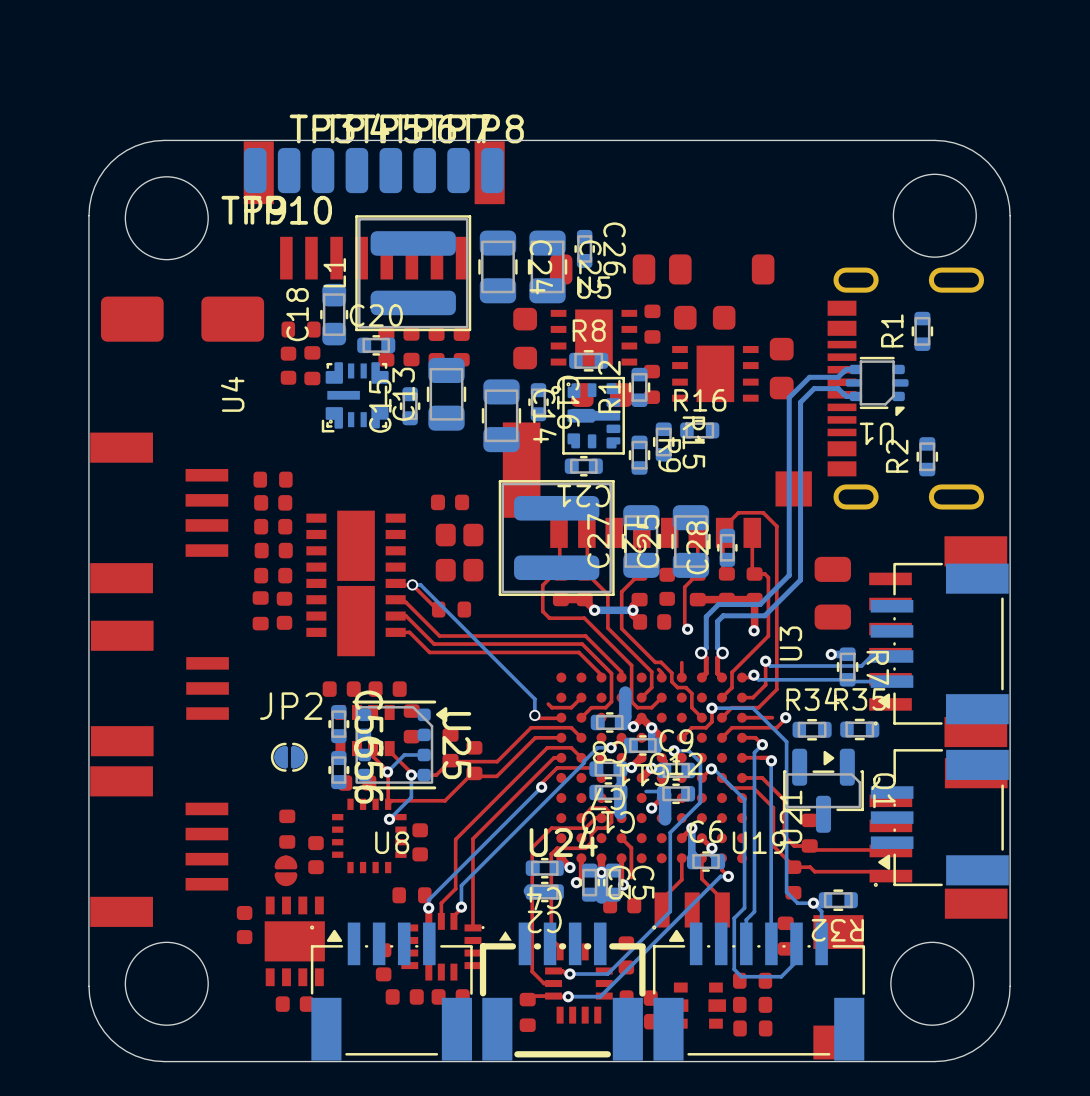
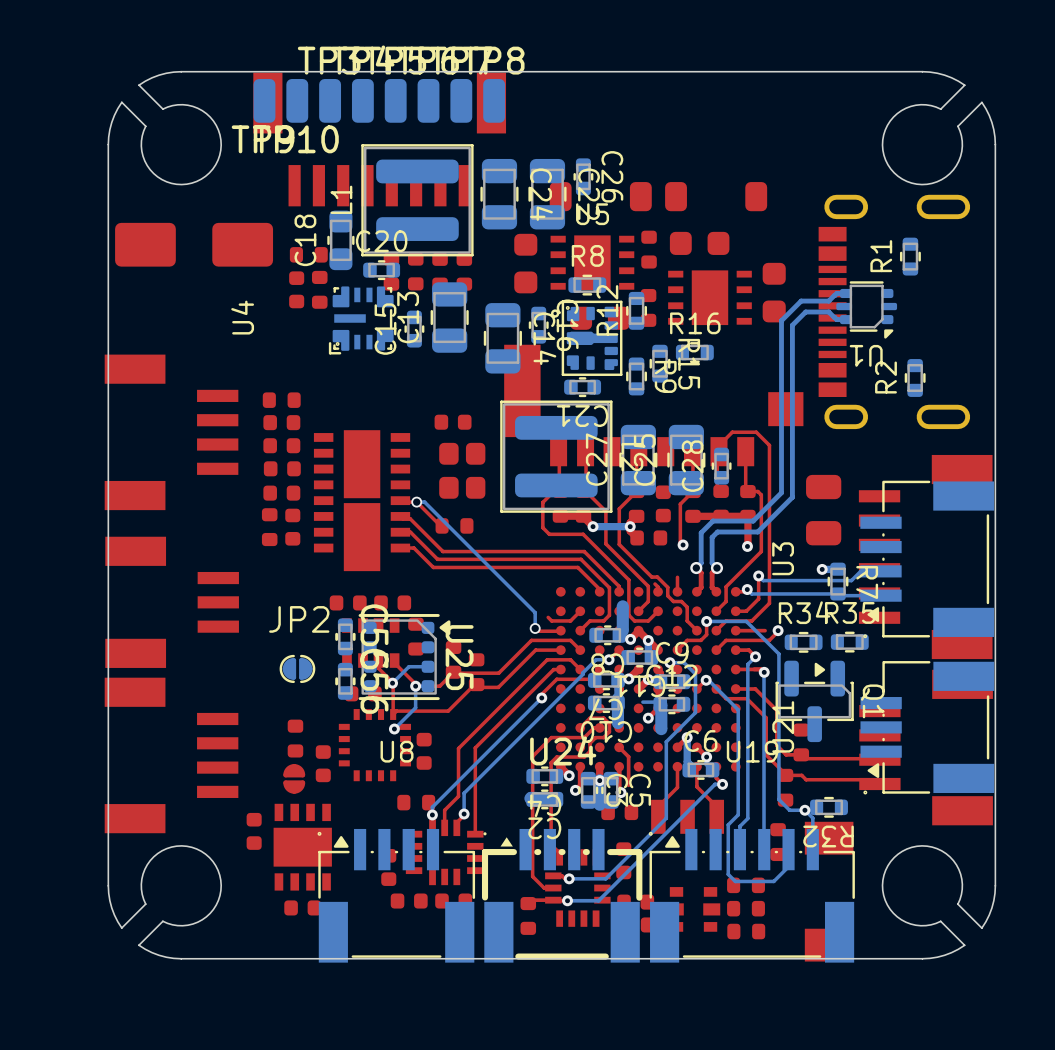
board edge: (169, 140) (154, 141) (135, 146) (111, 162) (94, 186) (88, 215) (88, 986) (94, 1015) (111, 1039) (135, 1055) (164, 1061) (934, 1061) (963, 1055) (988, 1039) (1004, 1015) (1009, 996) (1010, 981) -> (181, 71) (159, 75) (139, 85) (162, 109) (172, 105) (187, 105) (202, 110) (213, 121) (220, 134) (220, 150) (218, 160) (209, 172) (196, 181) (181, 184) (171, 183) (157, 176) (147, 165) (141, 151) (142, 135) (145, 126) (121, 102) (114, 115) (108, 137) (108, 893) (114, 914) (121, 928) (145, 904) (141, 884) (147, 864) (162, 850) (176, 846) (196, 849) (209, 857) (218, 870) (221, 885) (216, 905) (206, 916) (192, 924) (182, 925) (162, 921) (138, 945) (159, 955) (181, 958) (929, 958) (944, 955) (964, 945) (940, 921) (926, 925) (910, 924) (901, 919) (890, 909) (883, 895) (882, 885) (885, 870) (894, 857) (906, 849) (921, 845) (932, 847) (946, 853) (956, 864) (961, 879) (961, 894) (957, 904) (981, 928) (991, 908) (995, 885)
board edge: (934, 140) (963, 146) (988, 162) (1004, 186) (1010, 215) -> (922, 71) (944, 75) (964, 85) (940, 109) (926, 104) (910, 106) (901, 110) (890, 121) (883, 134) (882, 145) (885, 160) (894, 172) (906, 181) (916, 184) (932, 183) (945, 176) (953, 169) (960, 156) (962, 141) (957, 126) (981, 102) (991, 122) (995, 144)
round board edge: [892, 173, 977, 258] -> none
round board edge: [124, 176, 209, 261] -> none
round board edge: [124, 941, 209, 1026] -> none
round board edge: [890, 941, 975, 1026] -> none

